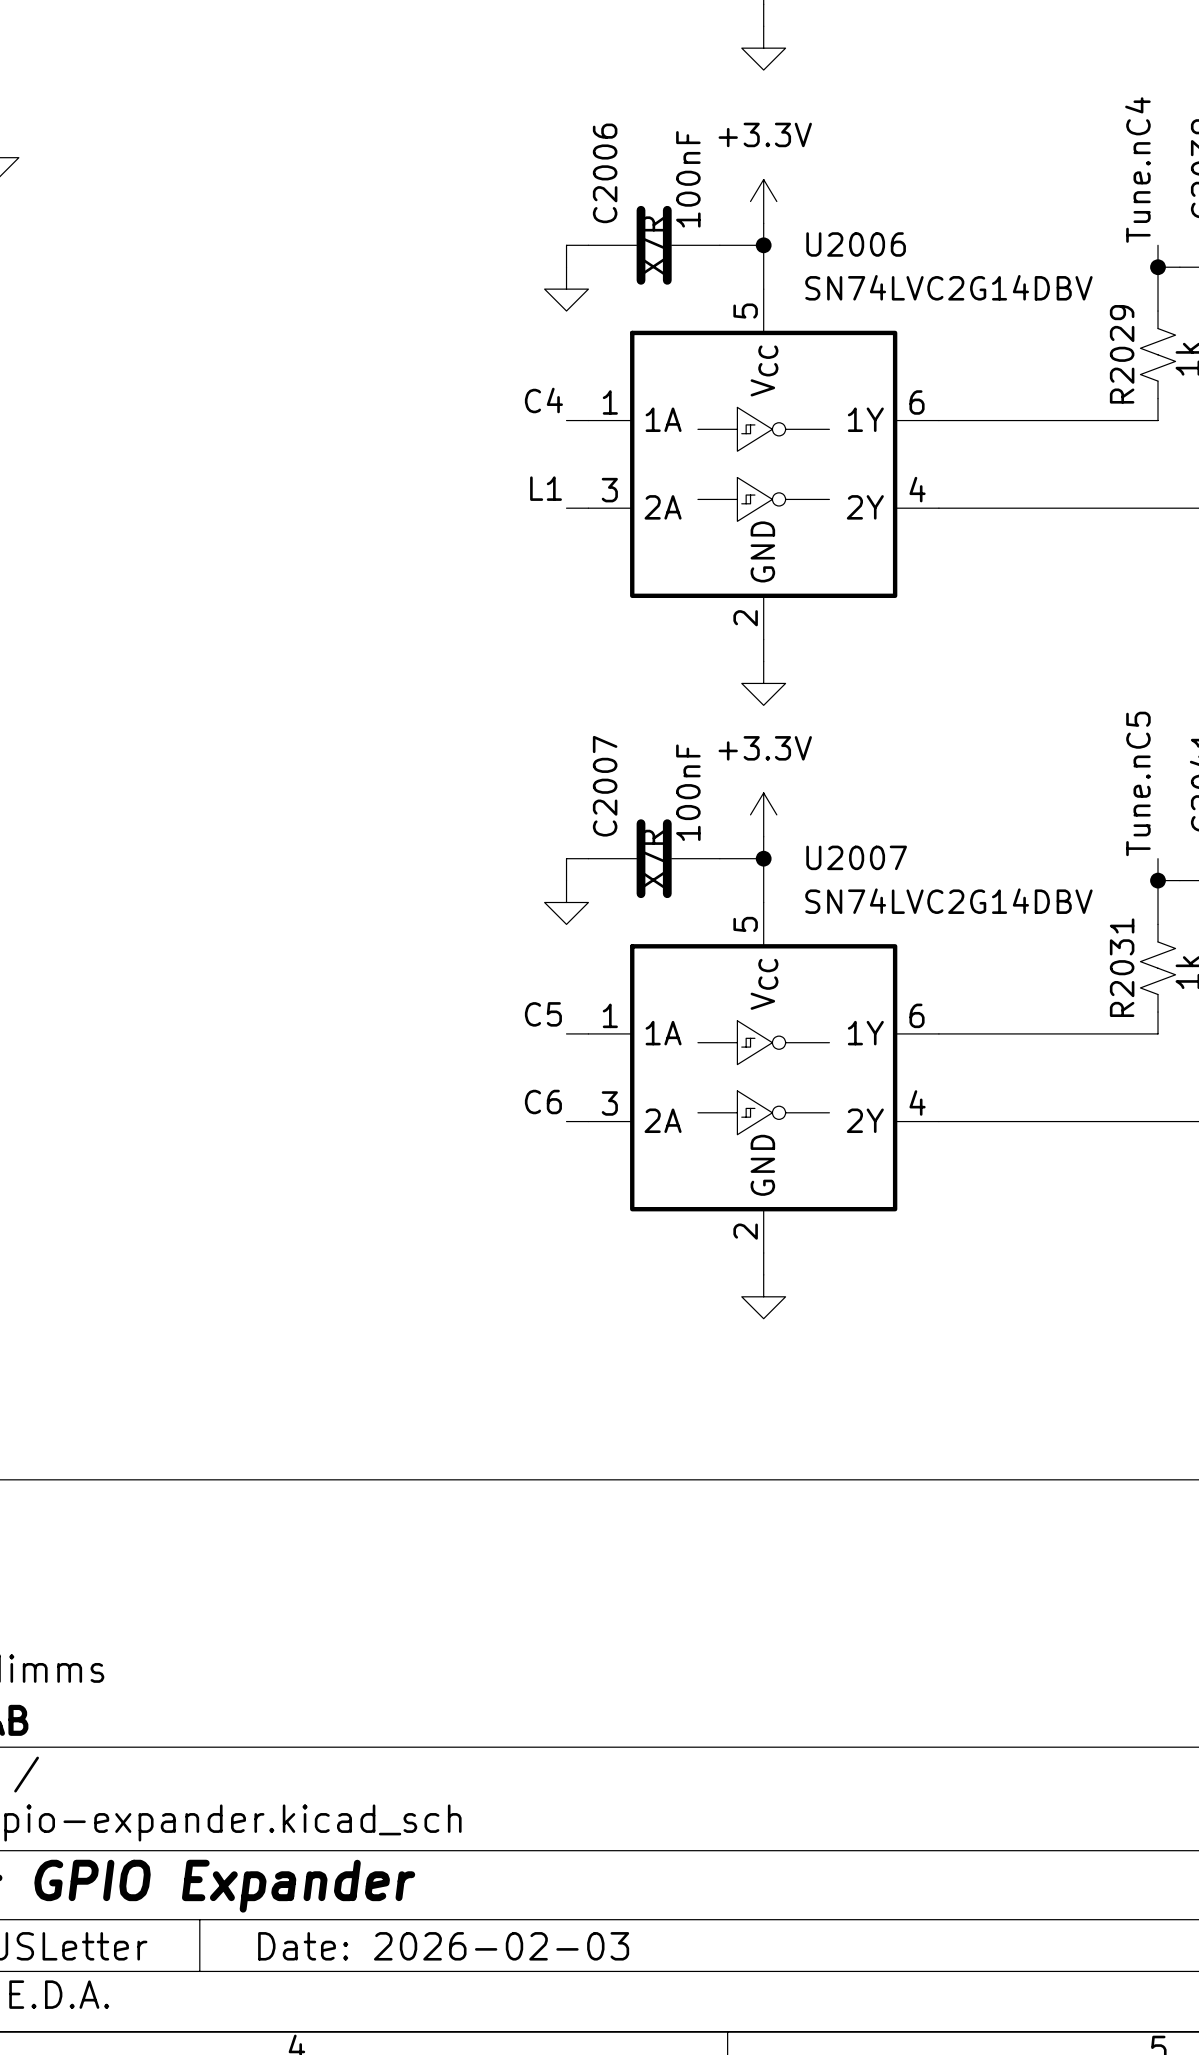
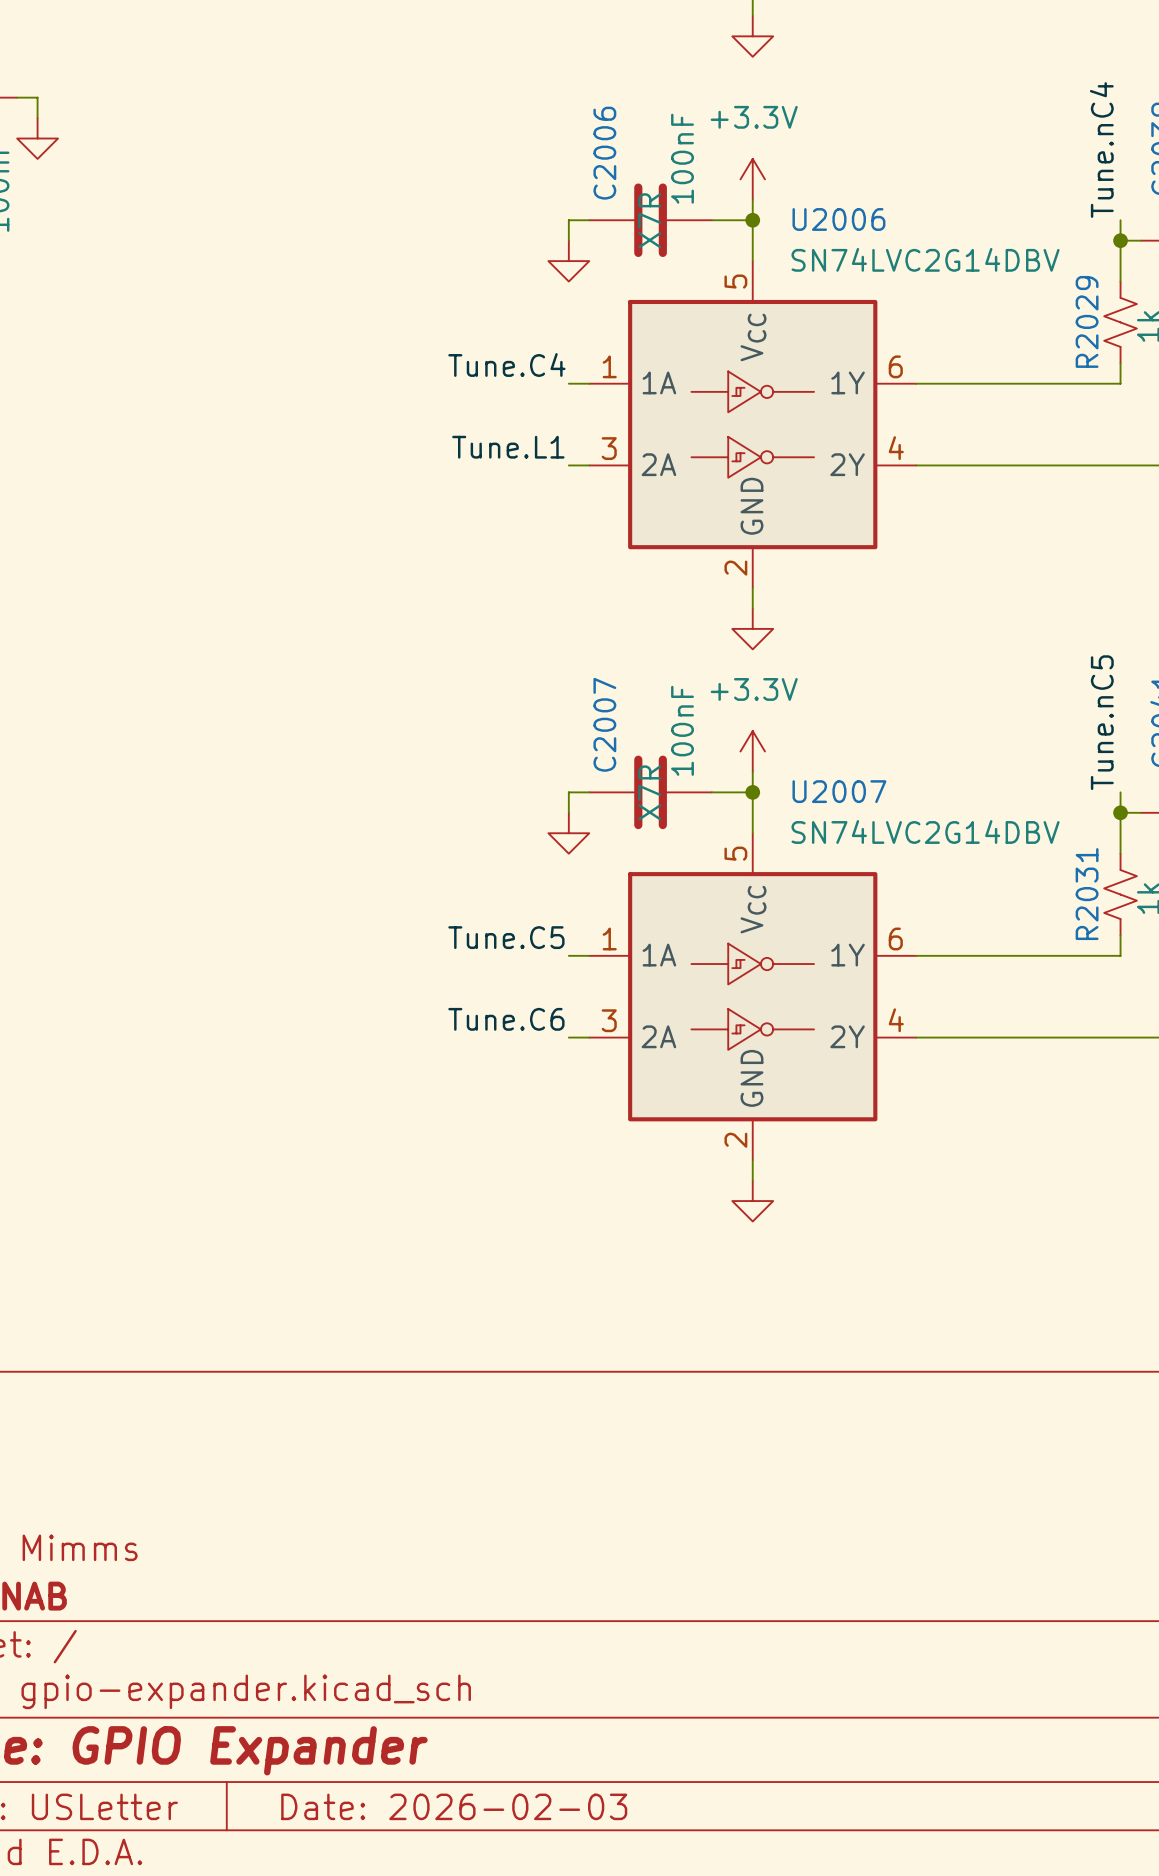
label: C4 (543, 400) -> Tune.C4 (506, 364)
label: L1 (546, 488) -> Tune.L1 (508, 447)
label: C5 (543, 1014) -> Tune.C5 (506, 937)
label: C6 (543, 1102) -> Tune.C6 (506, 1019)

